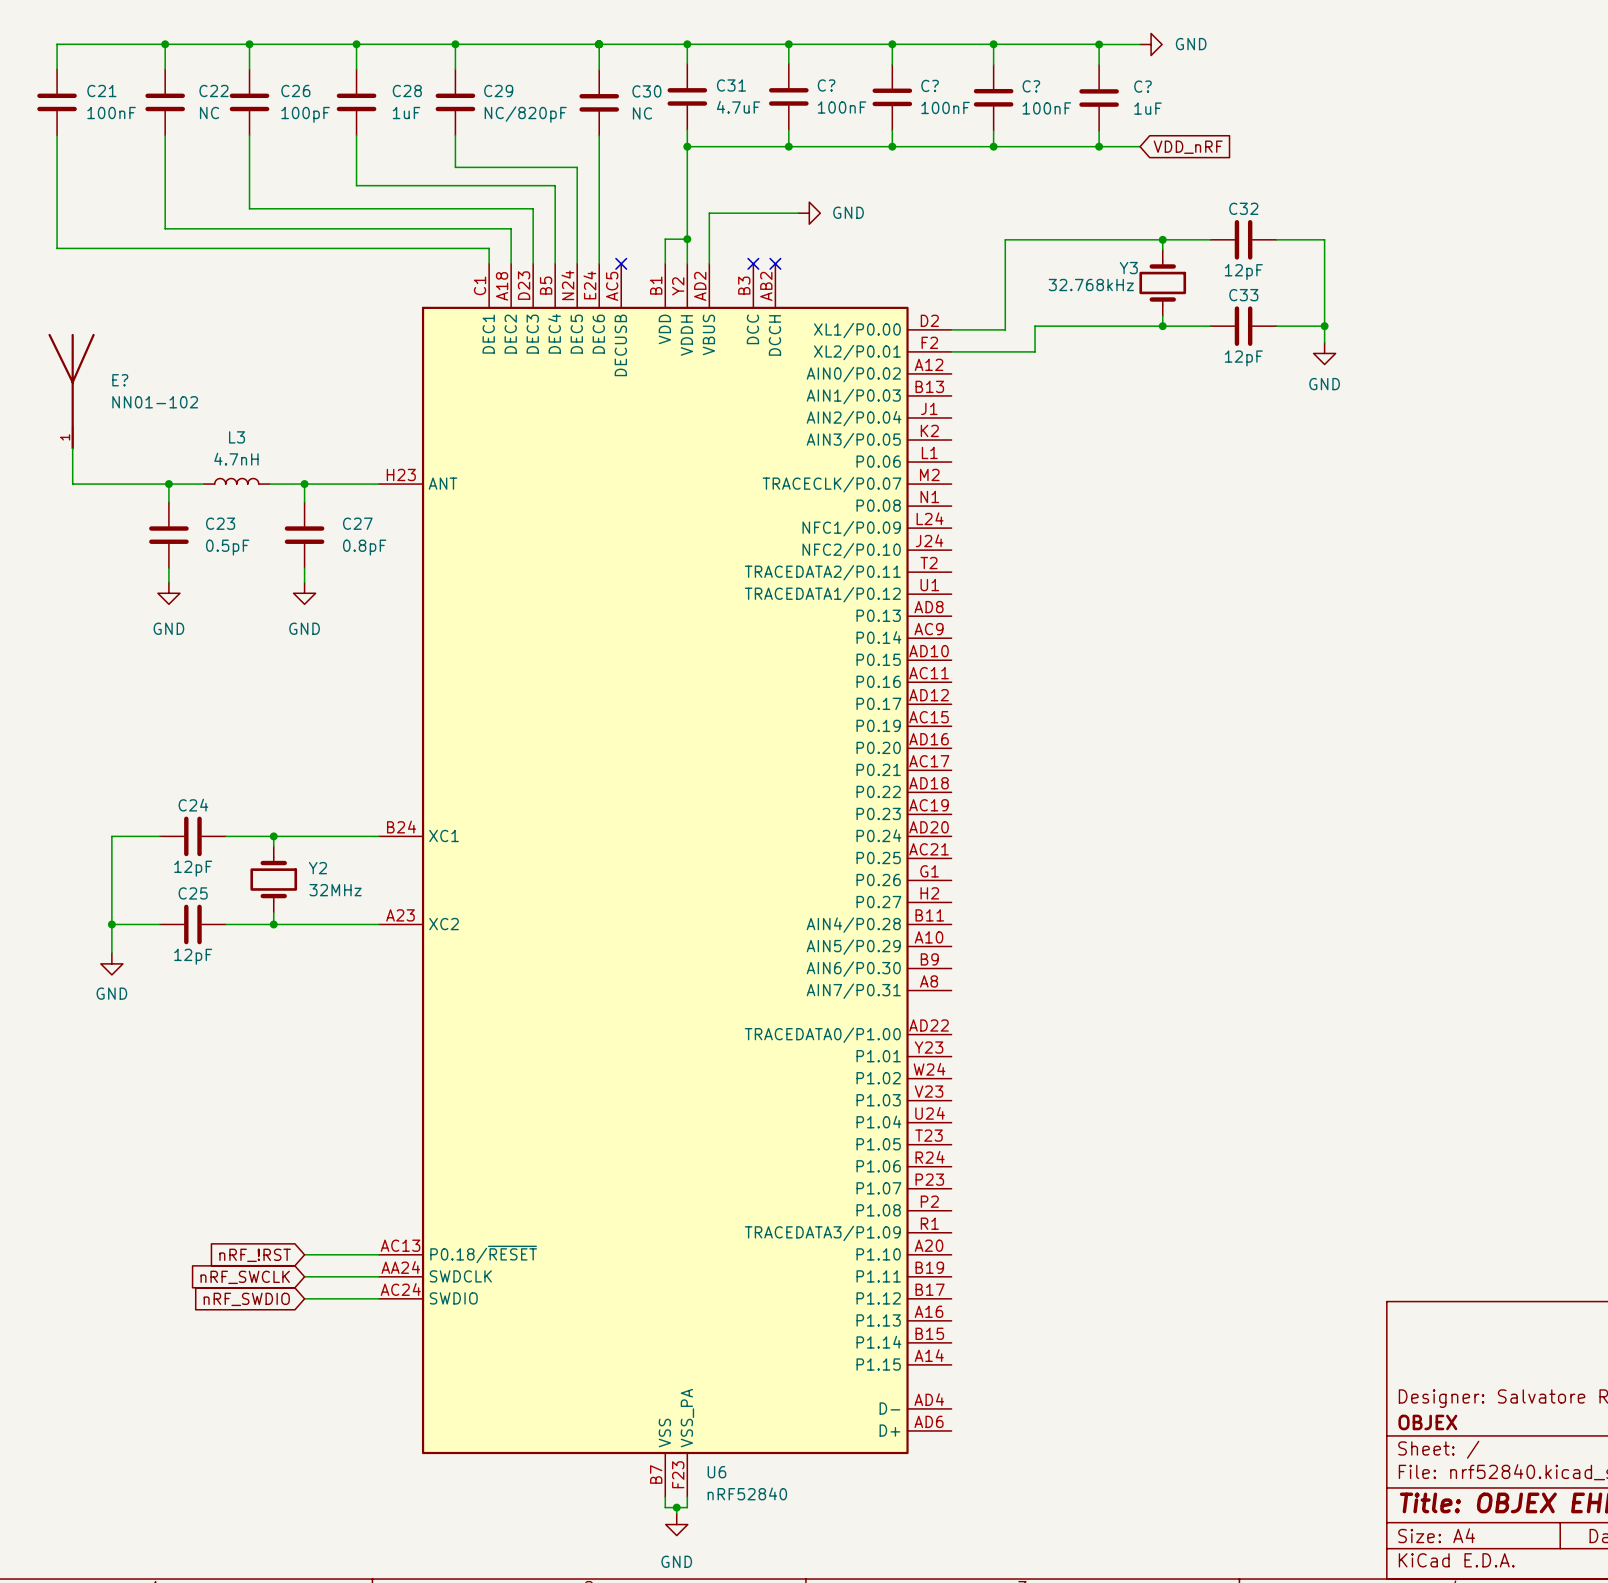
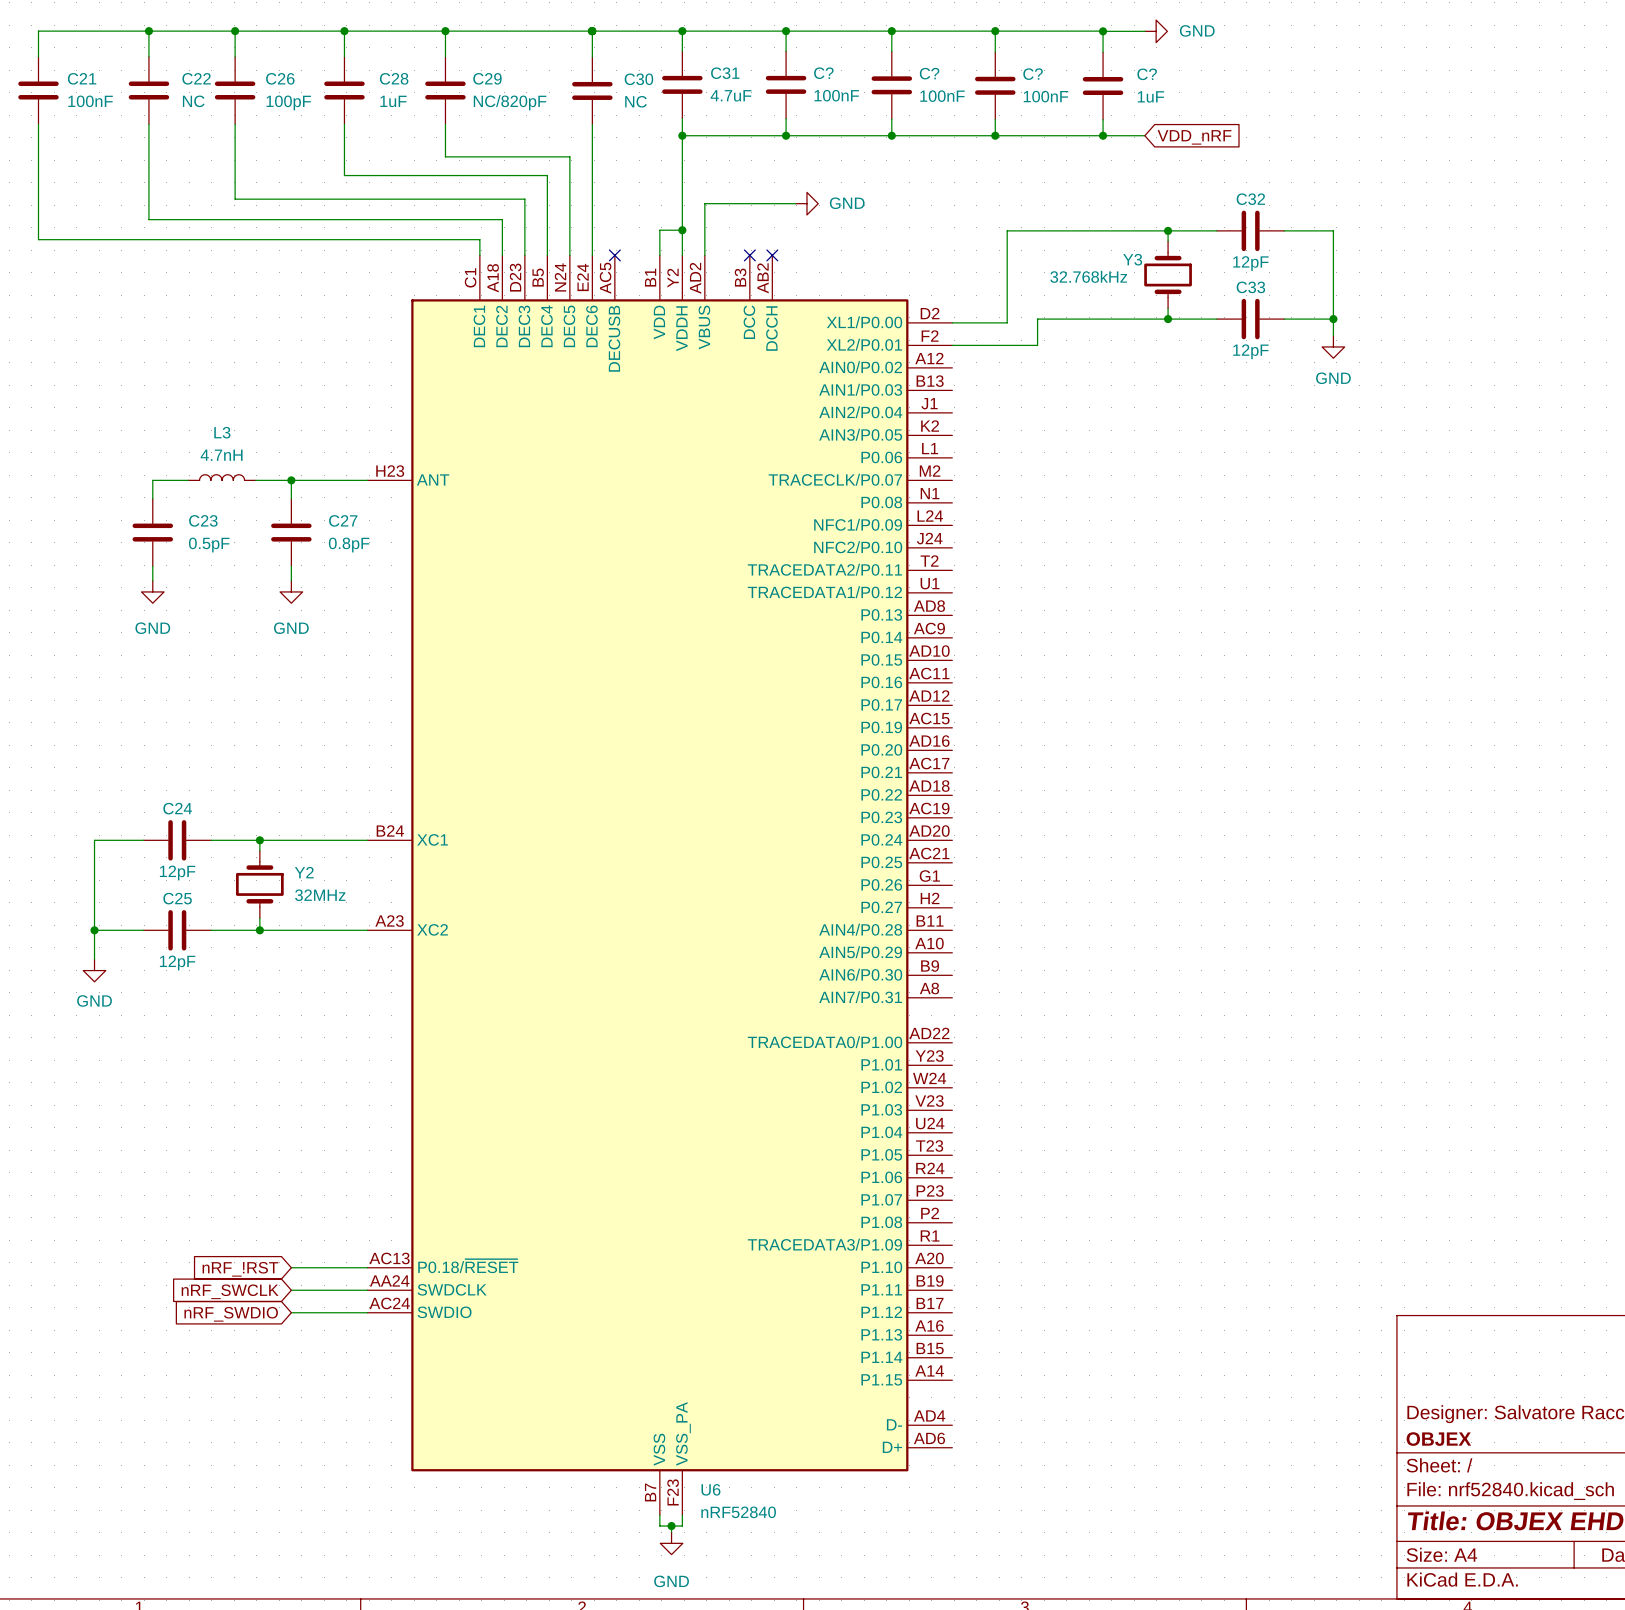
E?: NN01-102 (71, 391) -> none
wire: (72, 448) (72, 484) (168, 484) -> none
junction: (168, 484) -> none

